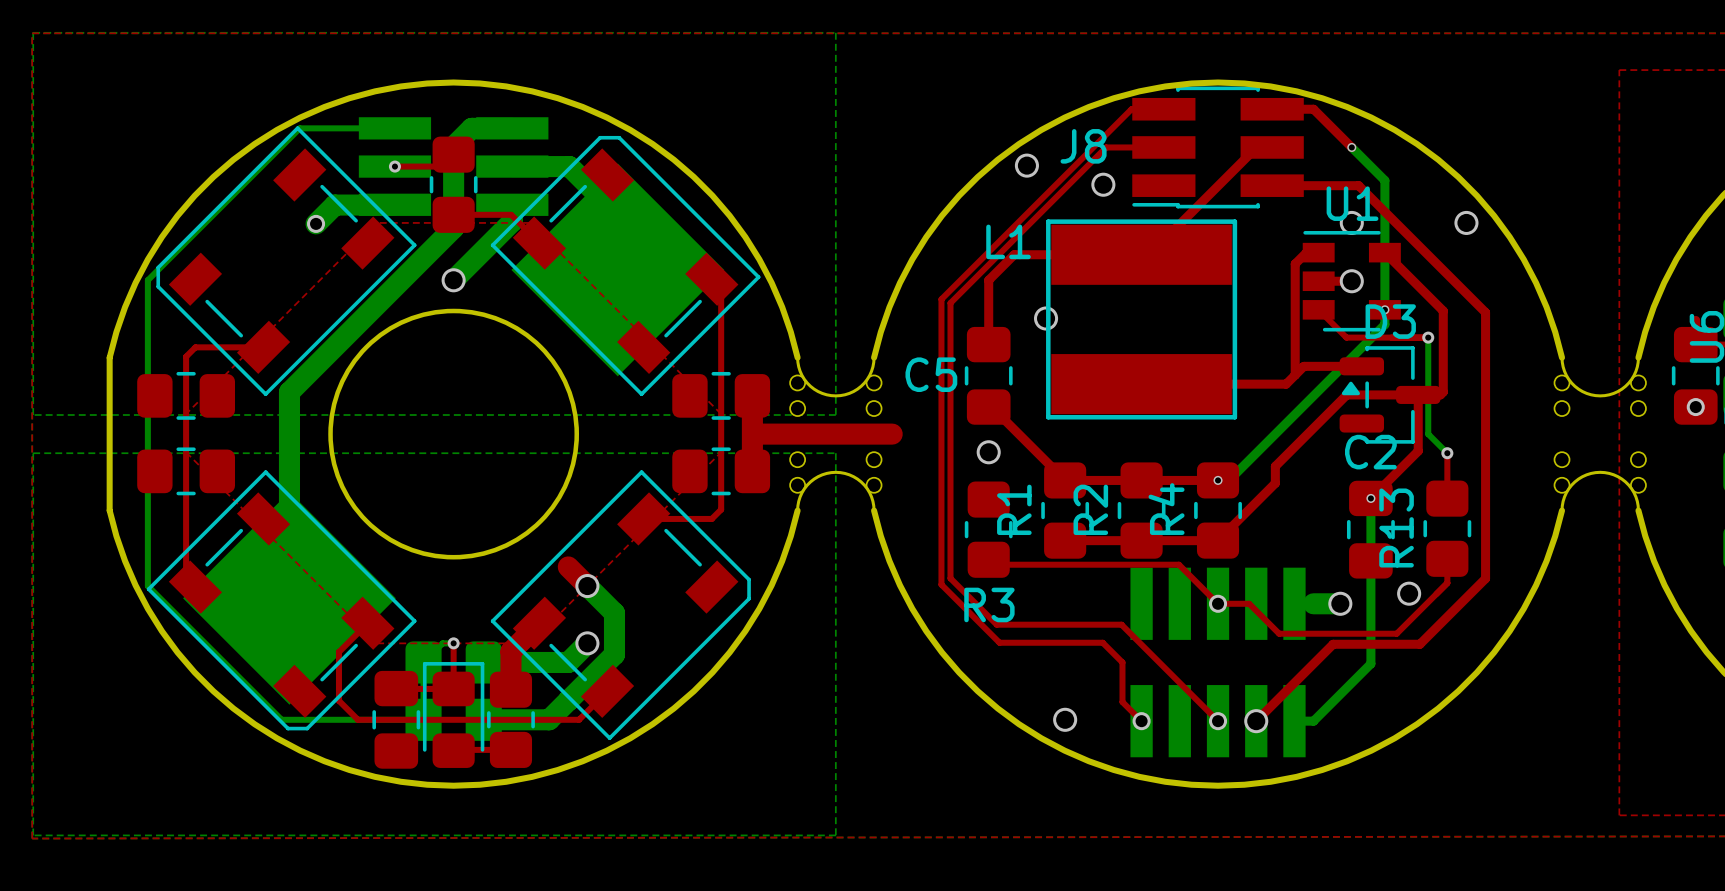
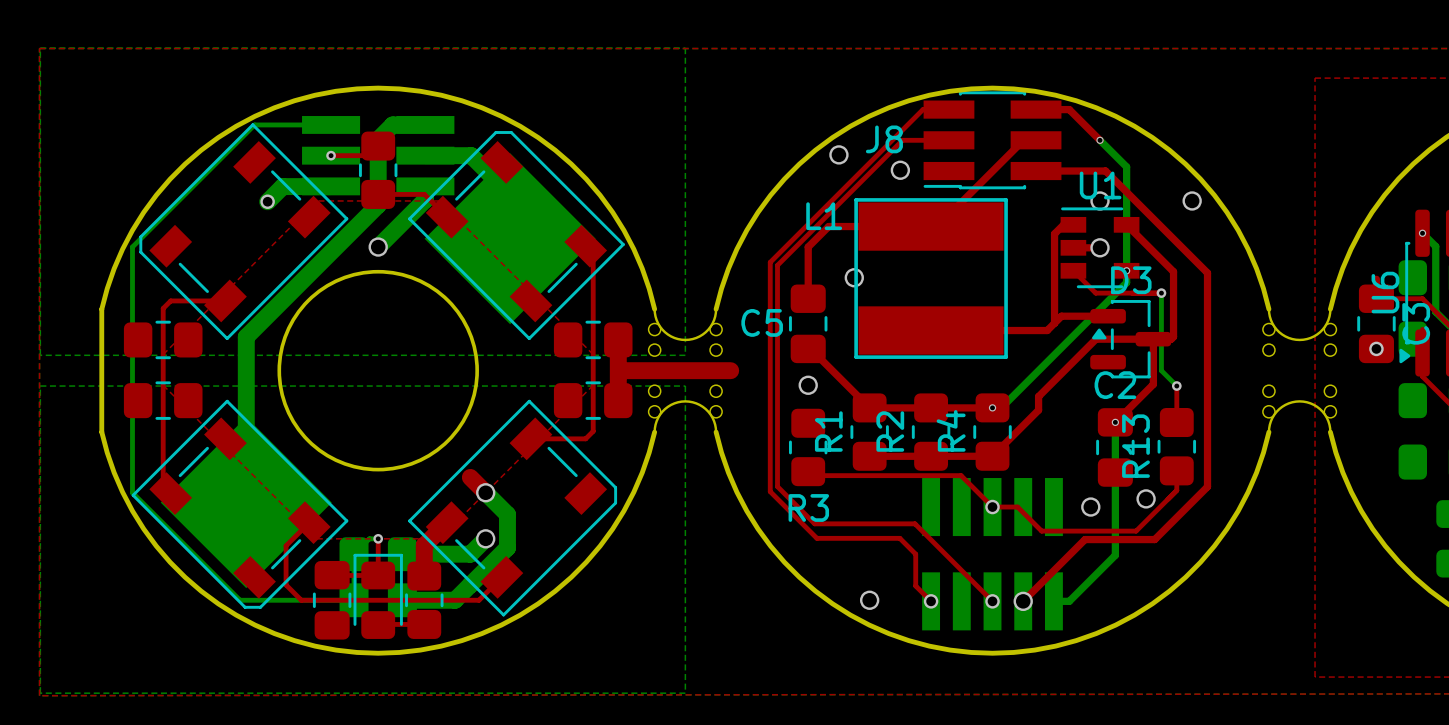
bottom track: (1313, 603) (1340, 603) -> none

